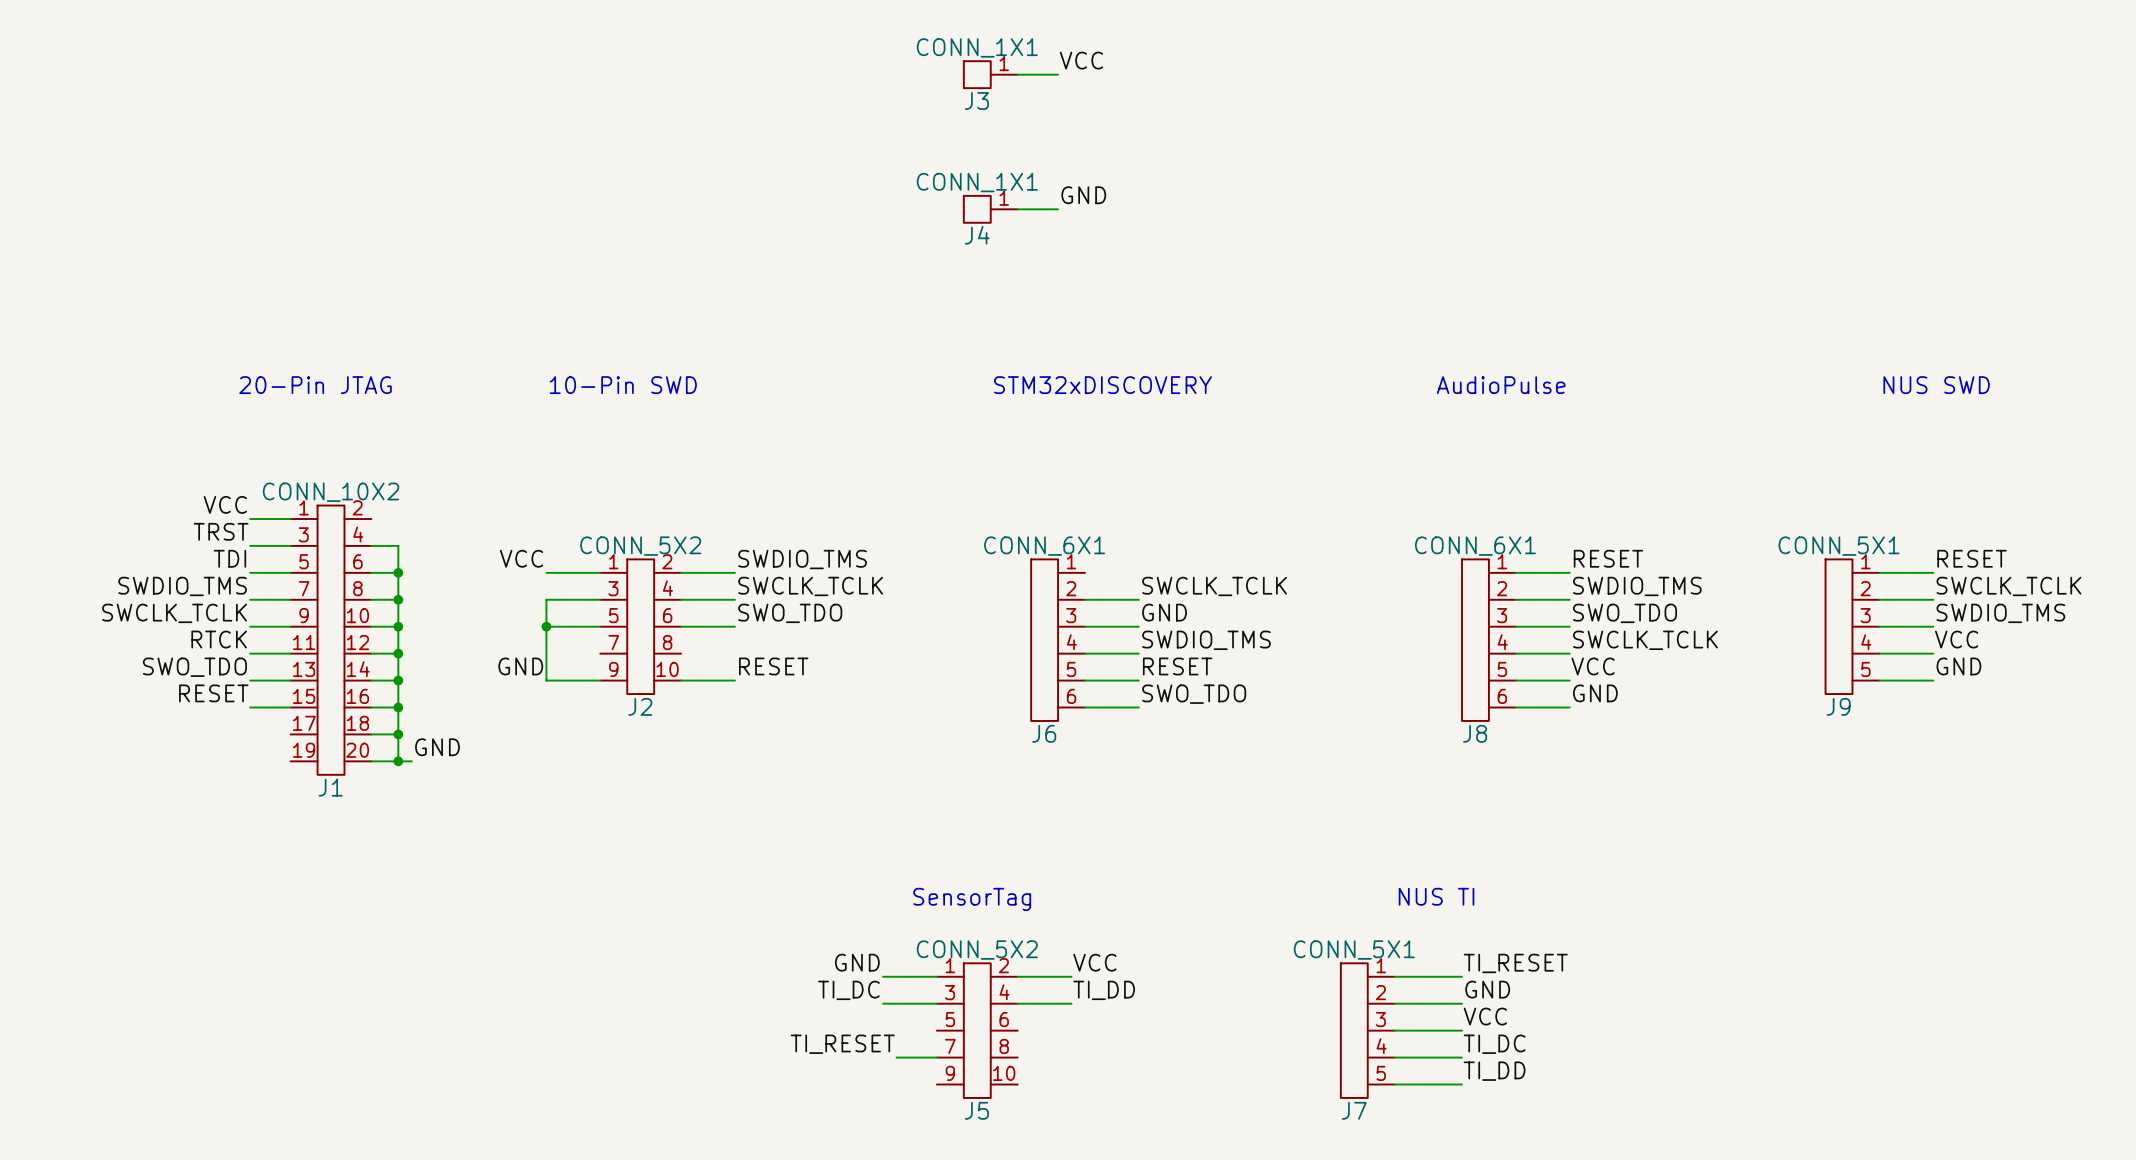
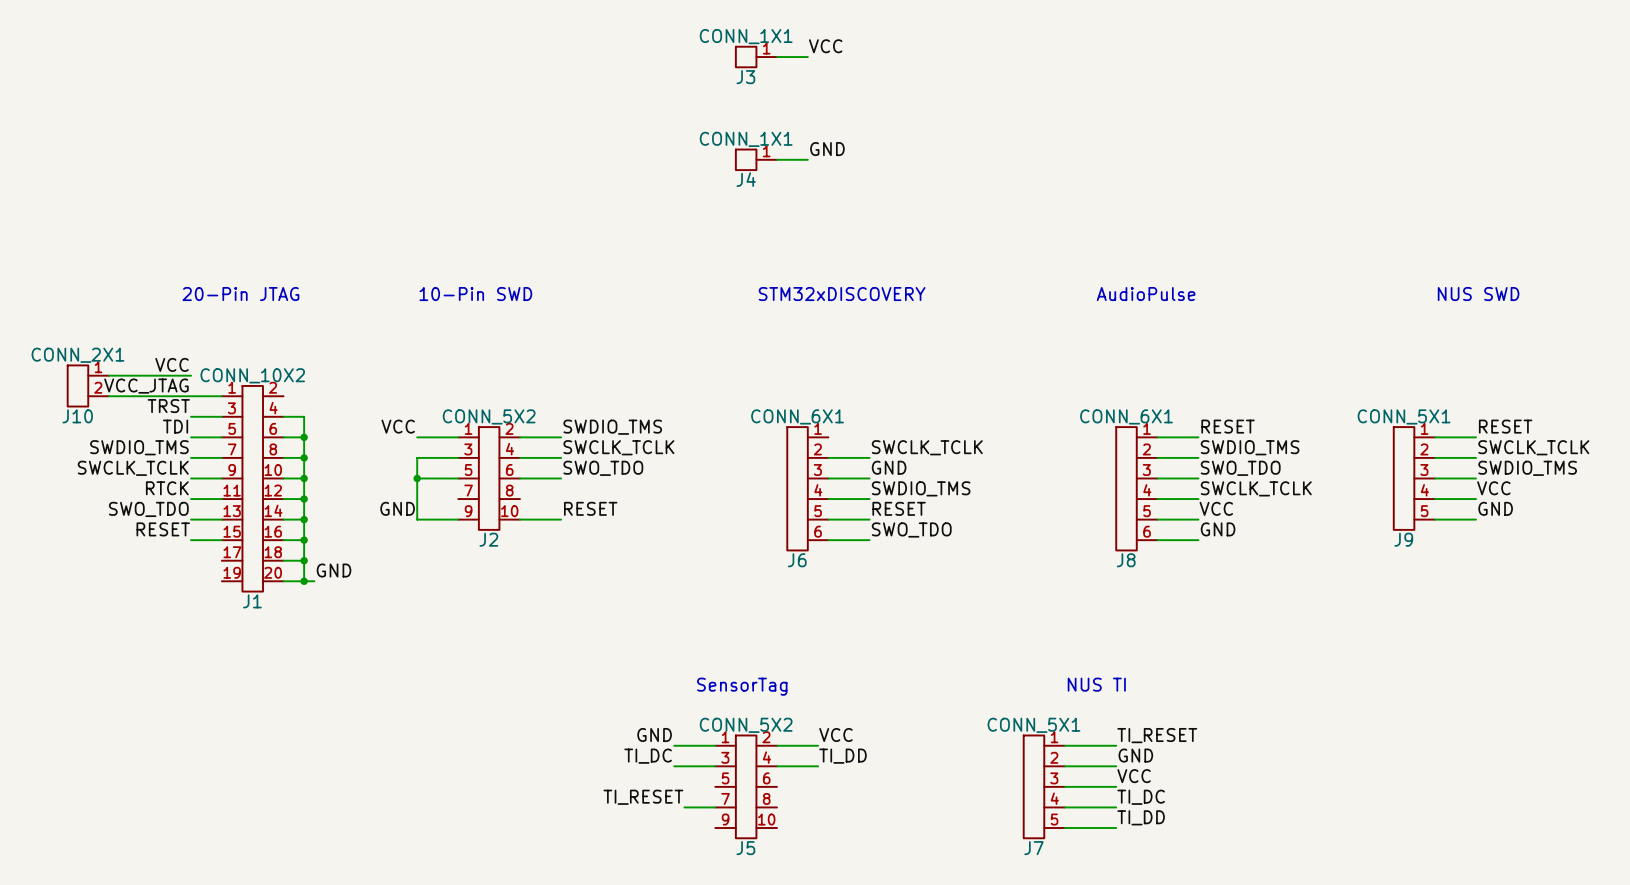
label: none -> VCC (172, 364)
wire: none -> (108, 375) (191, 375)
label: VCC (225, 504) -> VCC_JTAG (146, 386)
J10: none -> CONN_2X1 (88, 385)
wire: none -> (108, 396) (191, 396)

